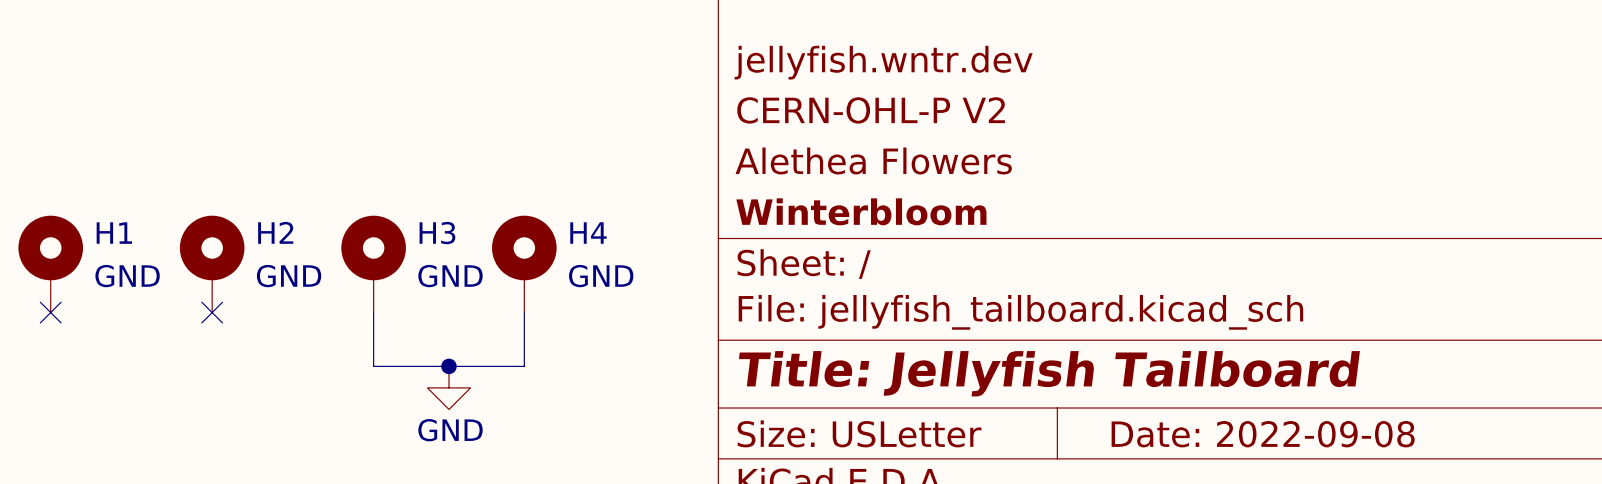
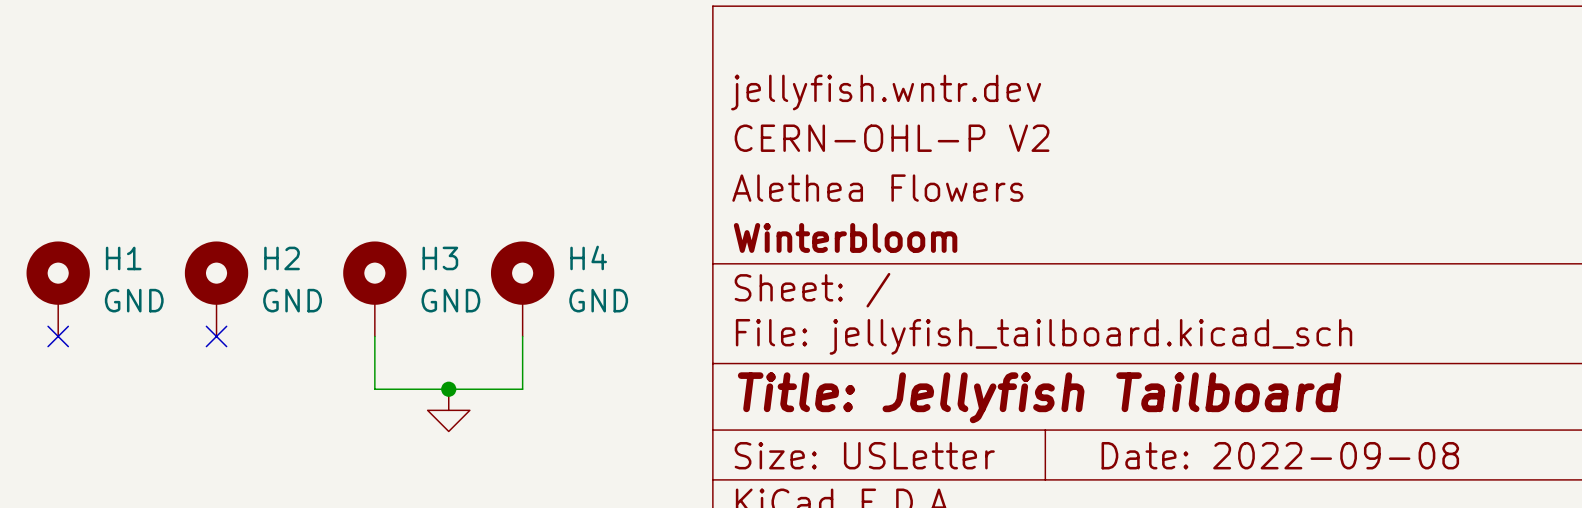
power symbol text: GND (450, 430) -> none

